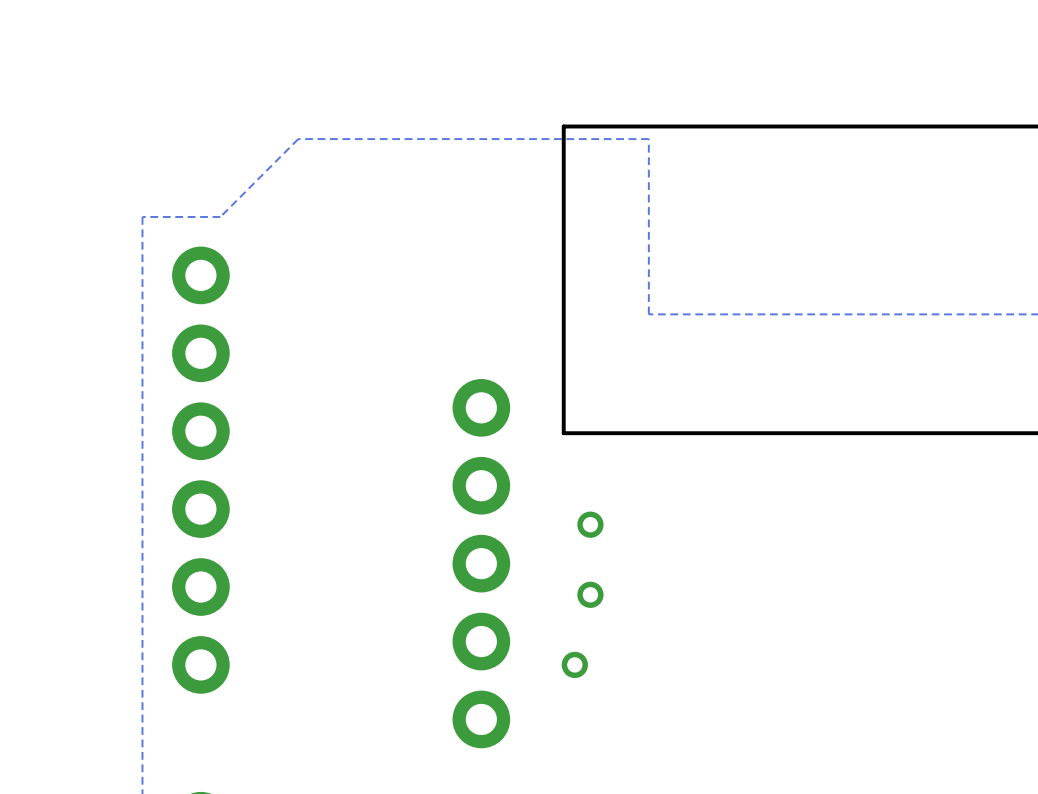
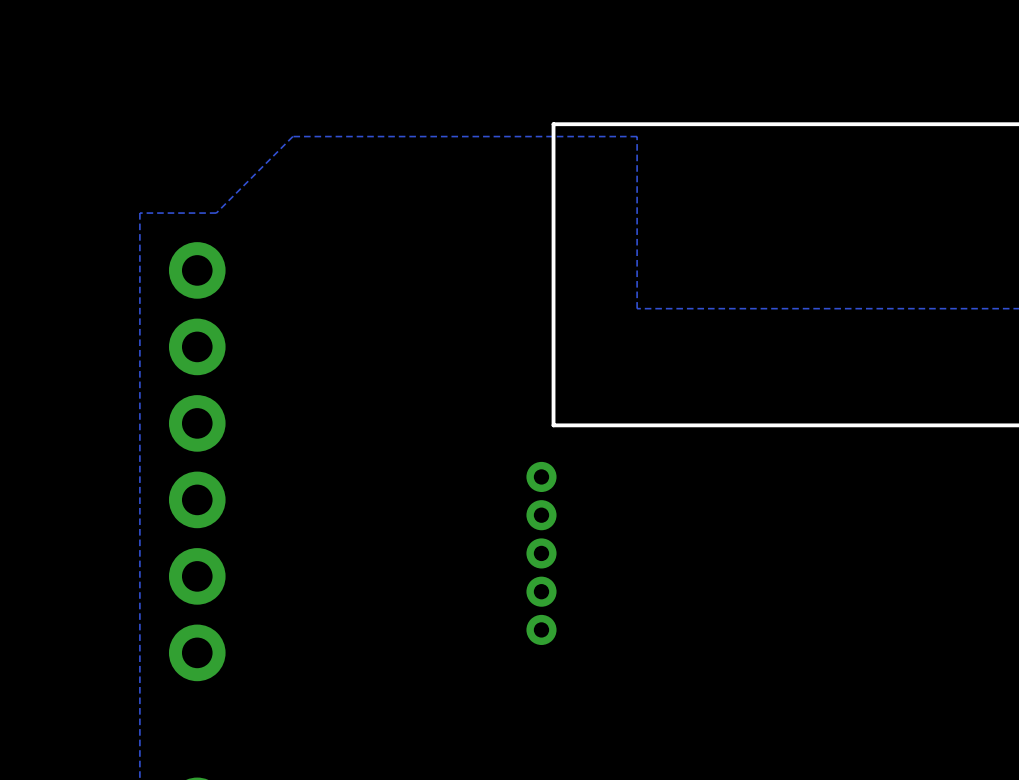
via: (590, 524) -> none
part: (481, 563) -> none
part: none -> (541, 553)
via: (590, 594) -> none
via: (574, 664) -> none

